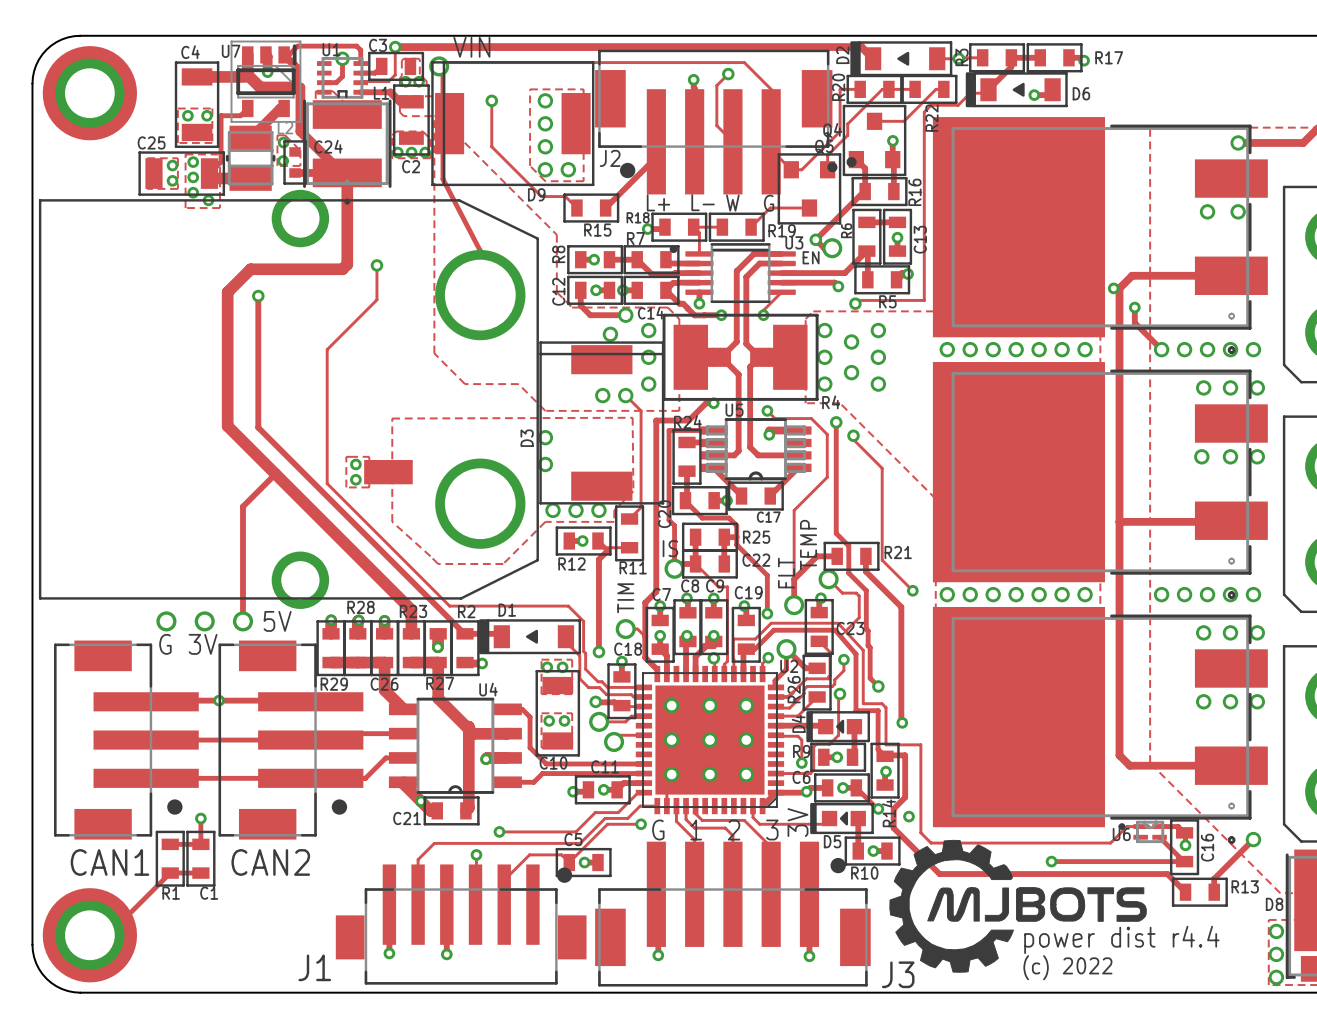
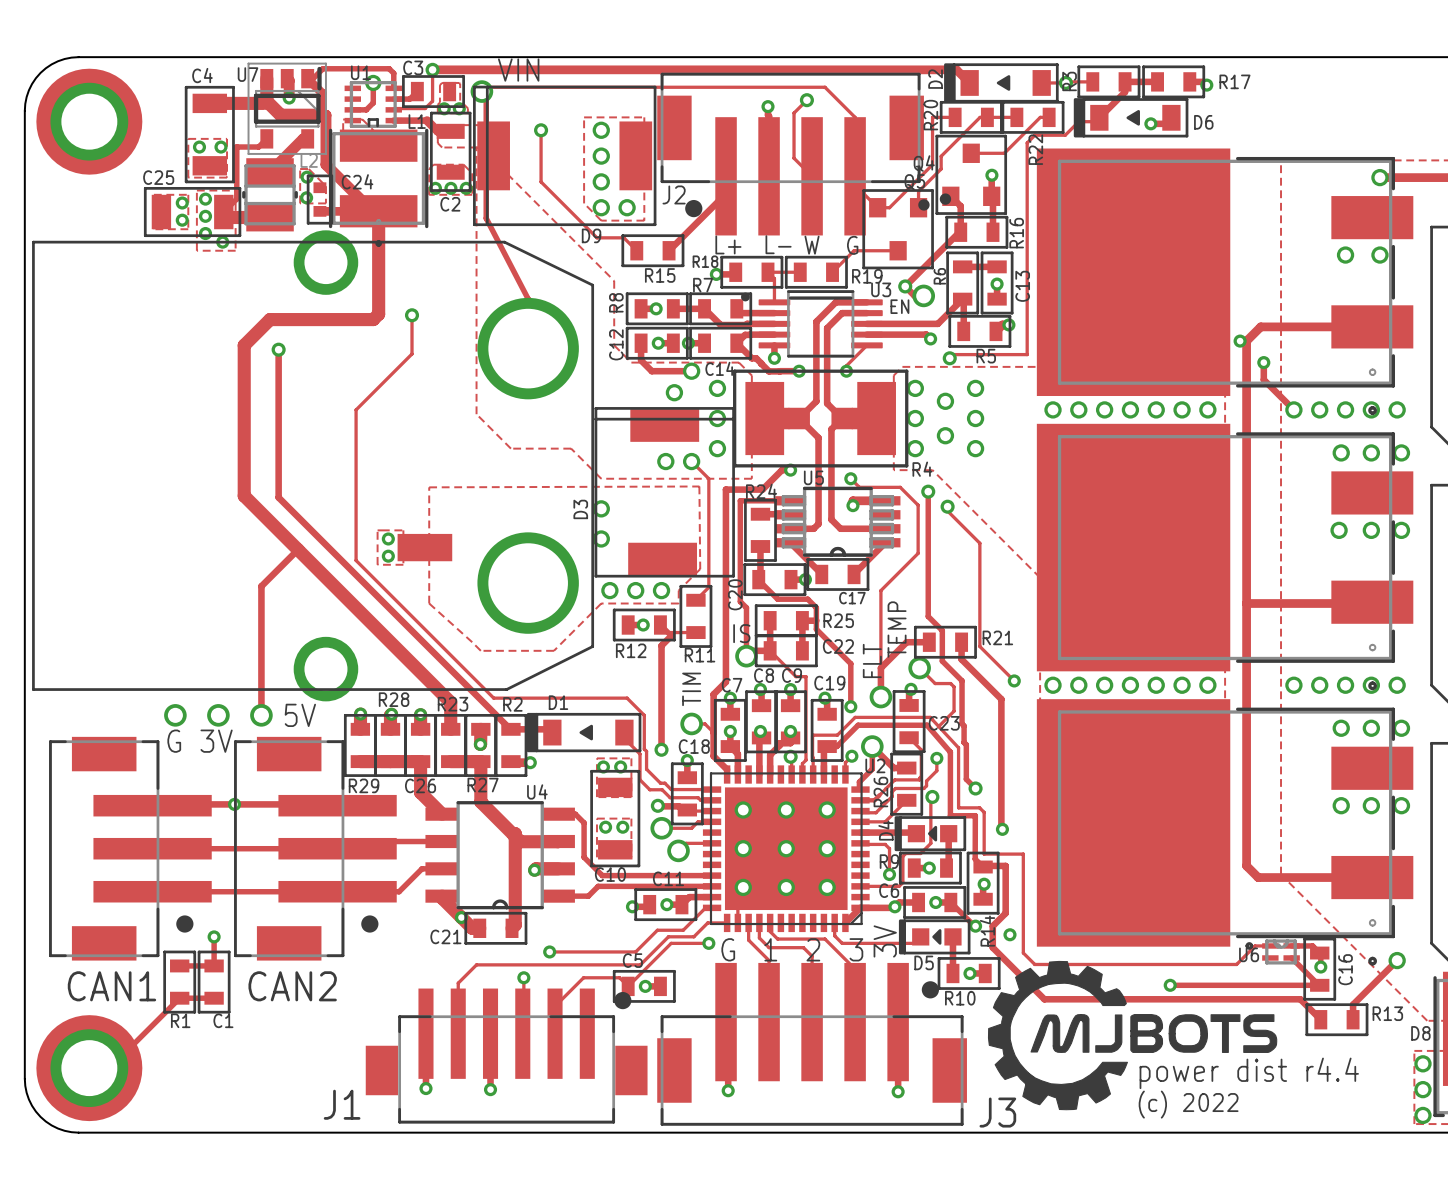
D3 footprint: [539, 341, 665, 505] -> [594, 407, 735, 578]

